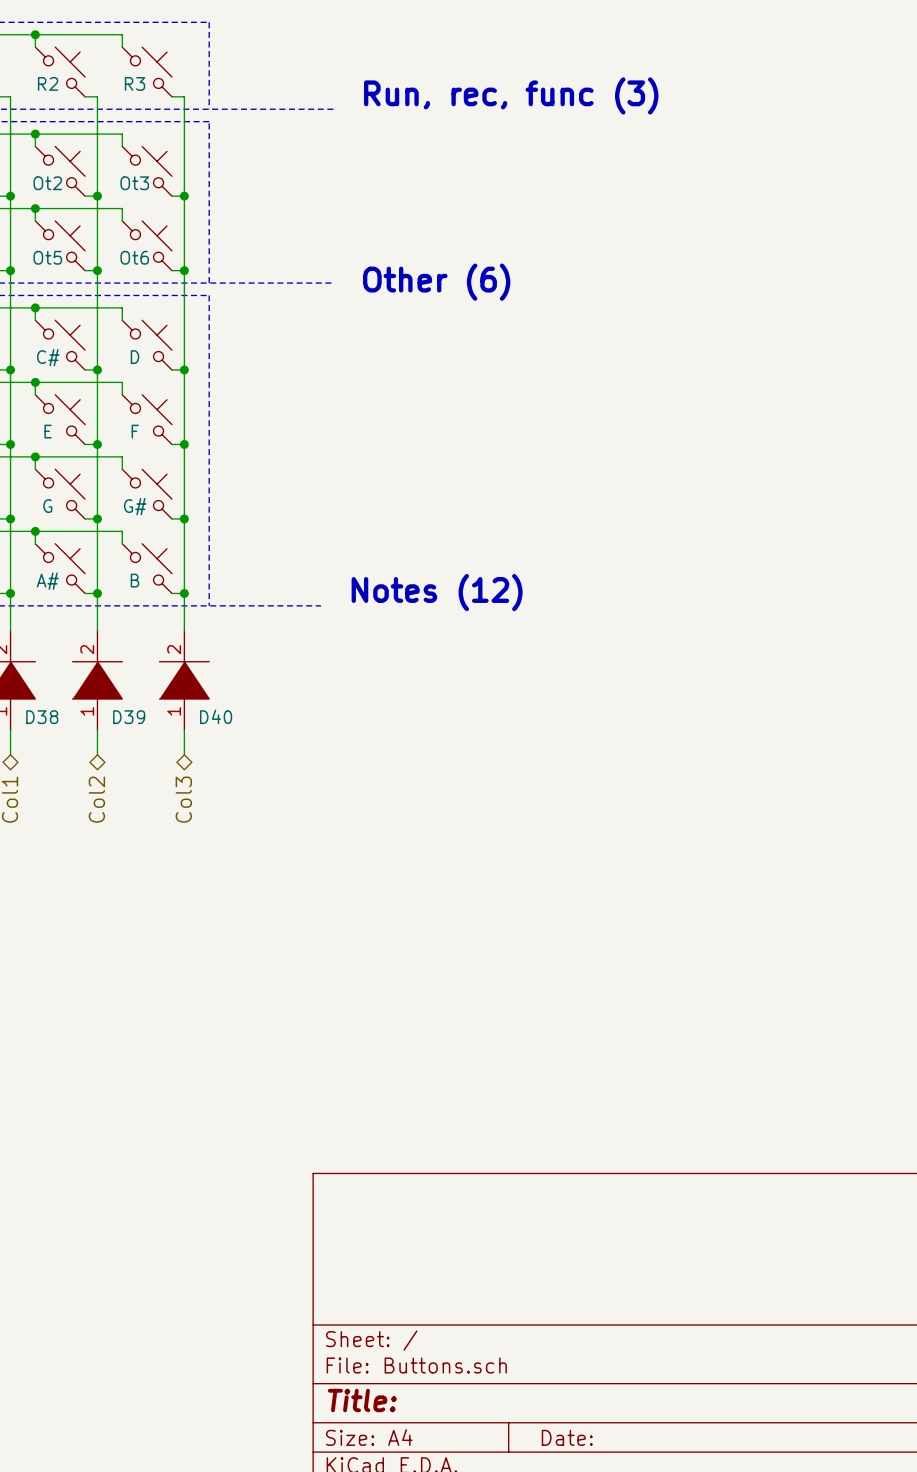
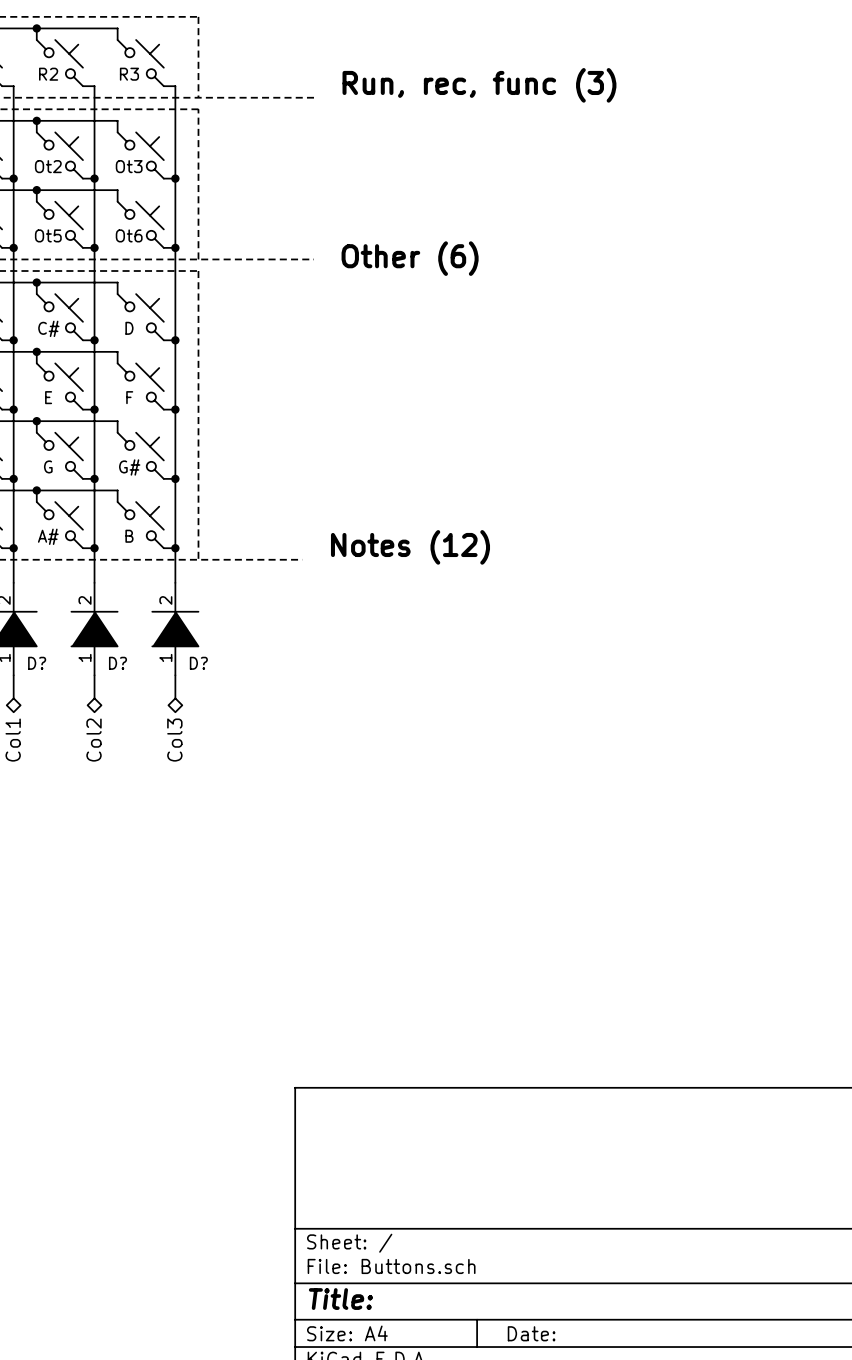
D40 name: D40 (216, 716) -> D? (198, 663)
D38 name: D38 (42, 717) -> D? (37, 663)
D39 name: D39 (129, 717) -> D? (117, 663)

